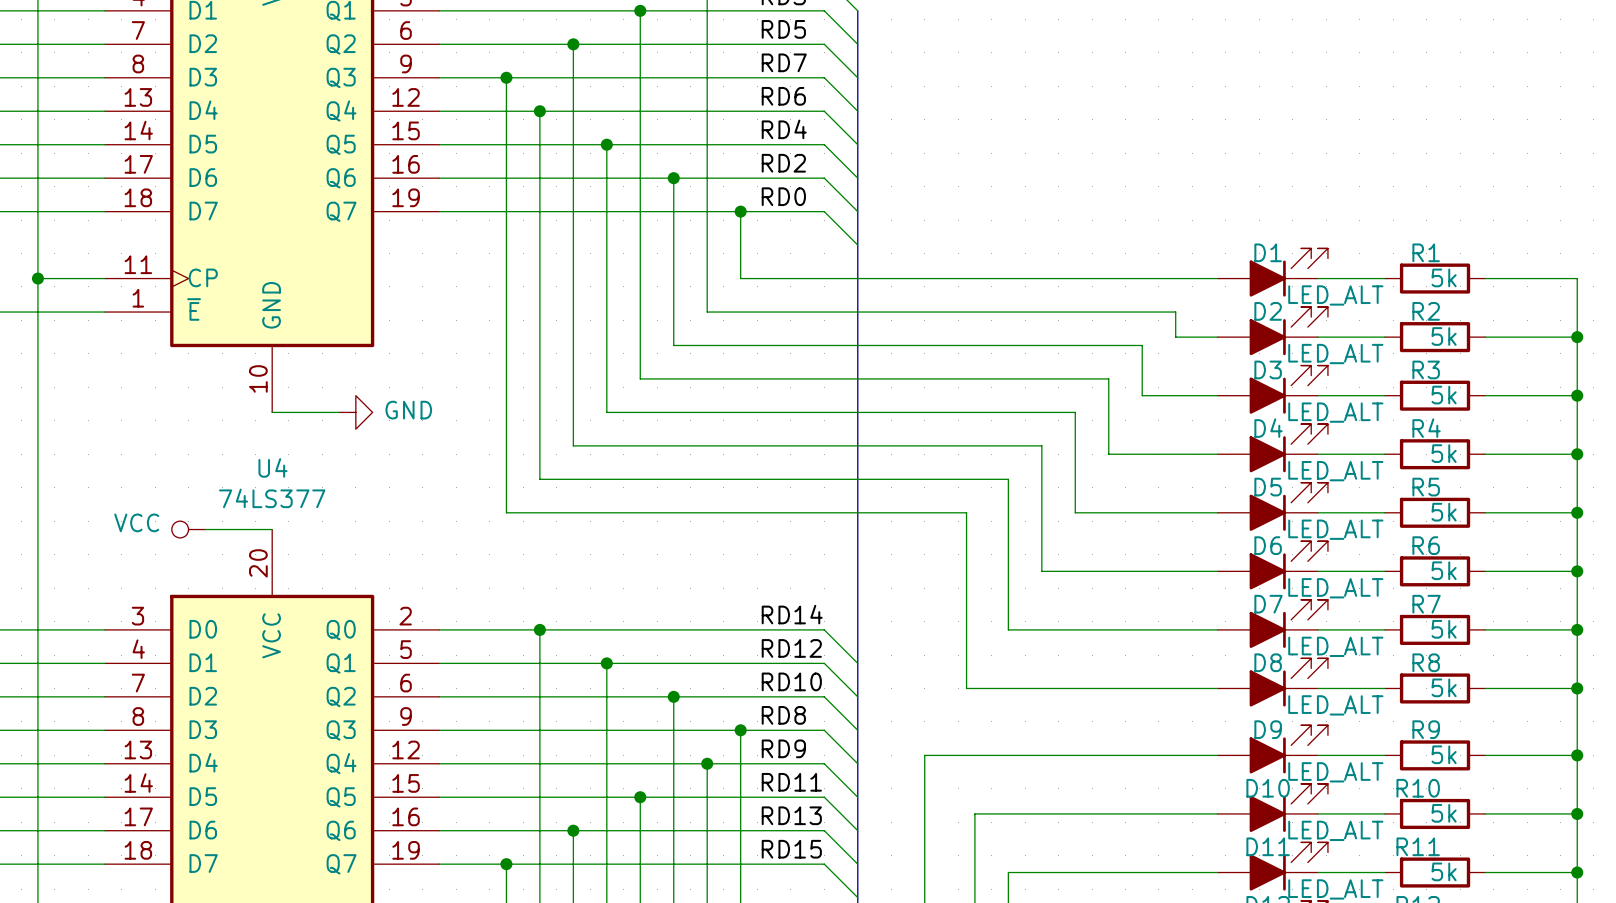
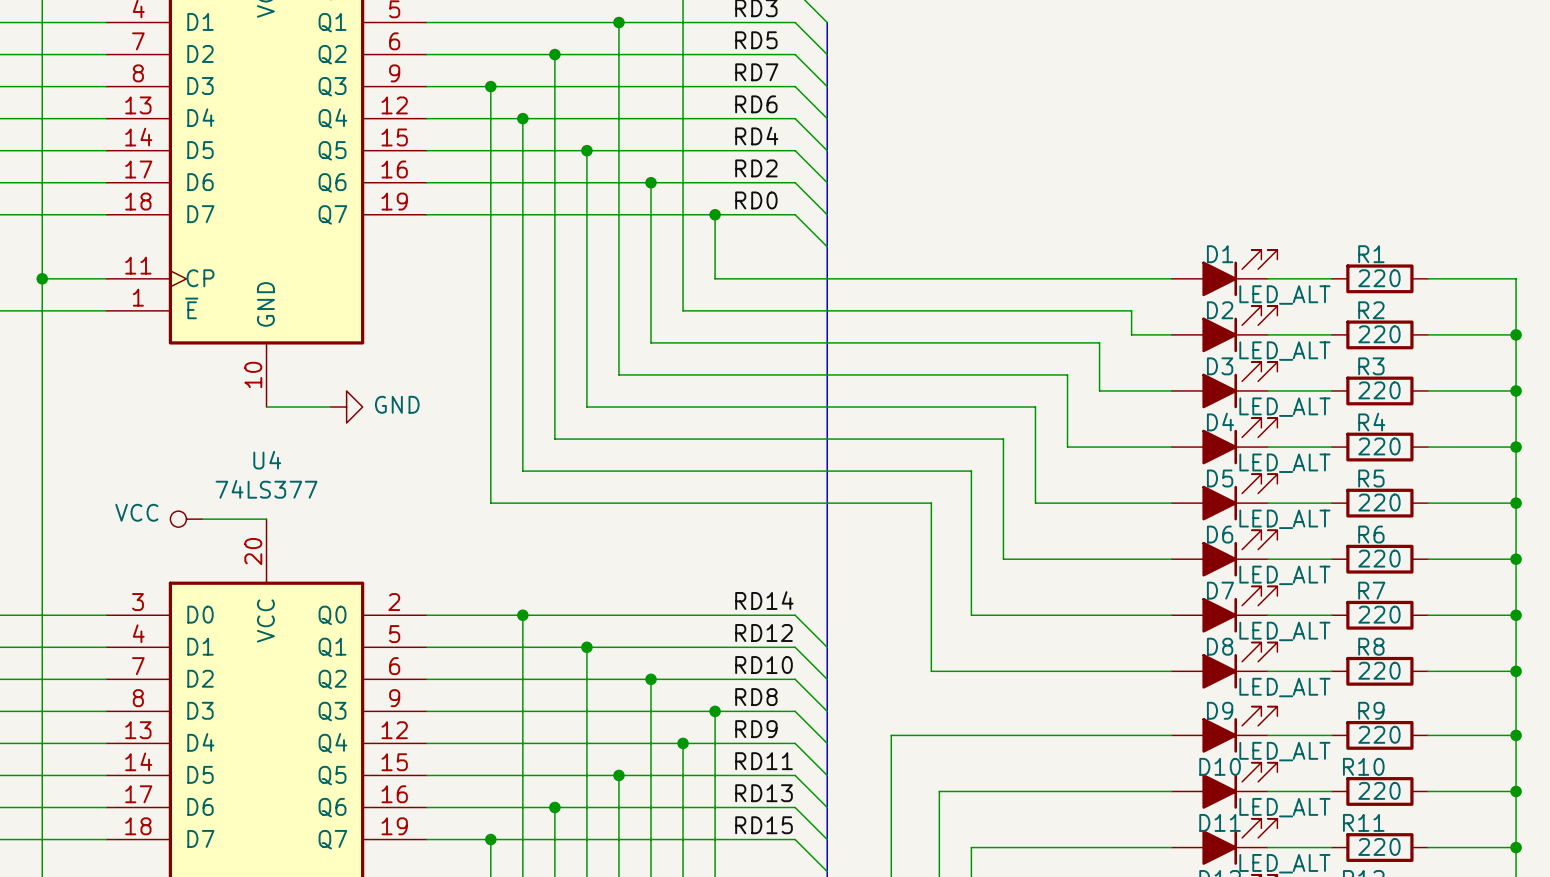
R1 value: 5k (1444, 277) -> 220 (1379, 278)
R2 value: 5k (1444, 336) -> 220 (1379, 334)
R3 value: 5k (1444, 395) -> 220 (1379, 390)
R4 value: 5k (1444, 453) -> 220 (1379, 446)
R5 value: 5k (1444, 512) -> 220 (1379, 502)
R6 value: 5k (1444, 570) -> 220 (1379, 558)
R7 value: 5k (1444, 629) -> 220 (1379, 614)
R8 value: 5k (1444, 687) -> 220 (1379, 670)
R9 value: 5k (1444, 754) -> 220 (1379, 734)
R10 value: 5k (1444, 813) -> 220 (1379, 790)
R11 value: 5k (1444, 871) -> 220 (1379, 846)

